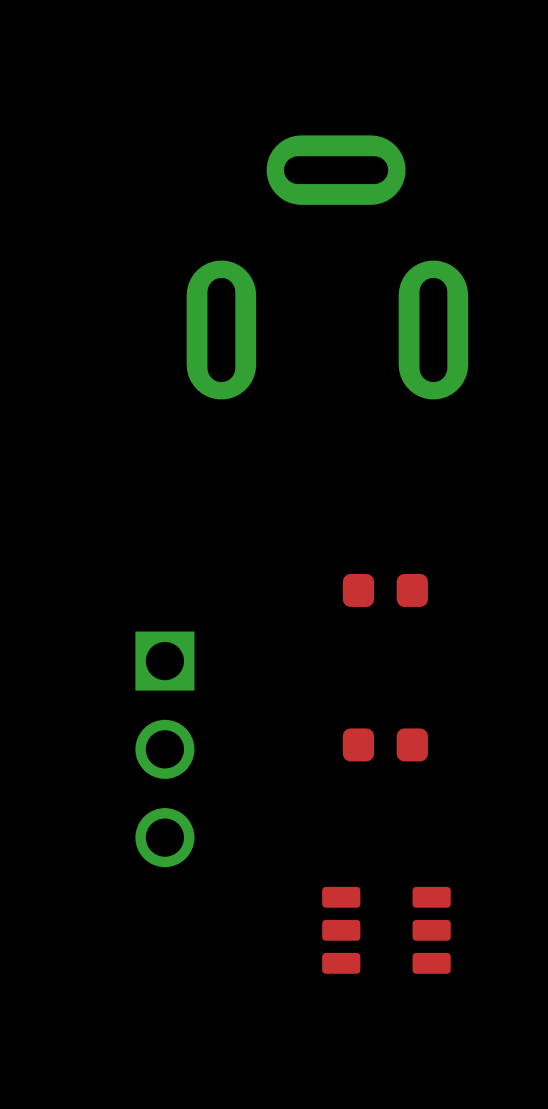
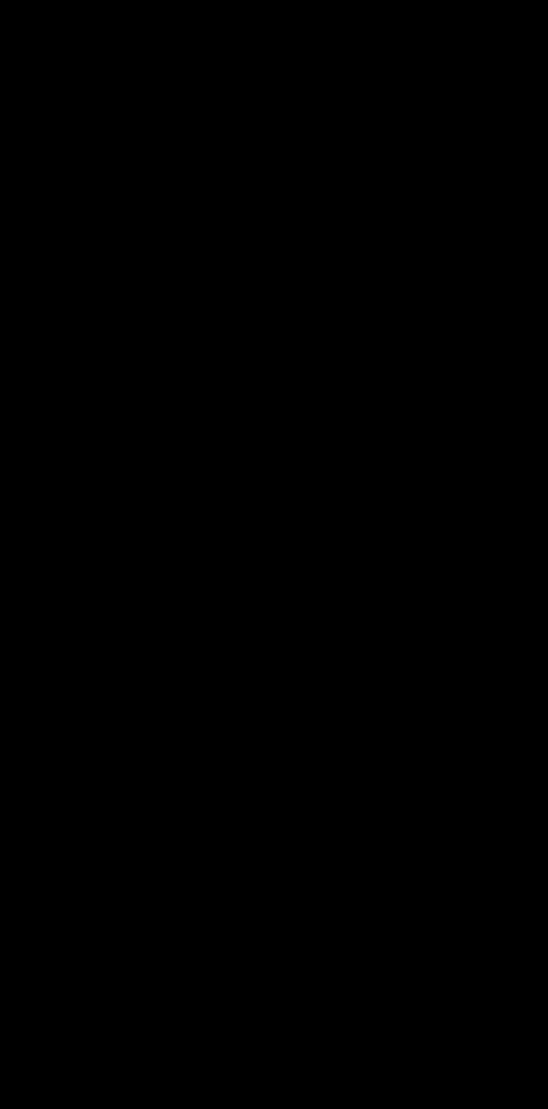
part: (327, 267) -> none
part: (385, 590) -> none
part: (385, 744) -> none
part: (164, 749) -> none
part: (386, 930) -> none

